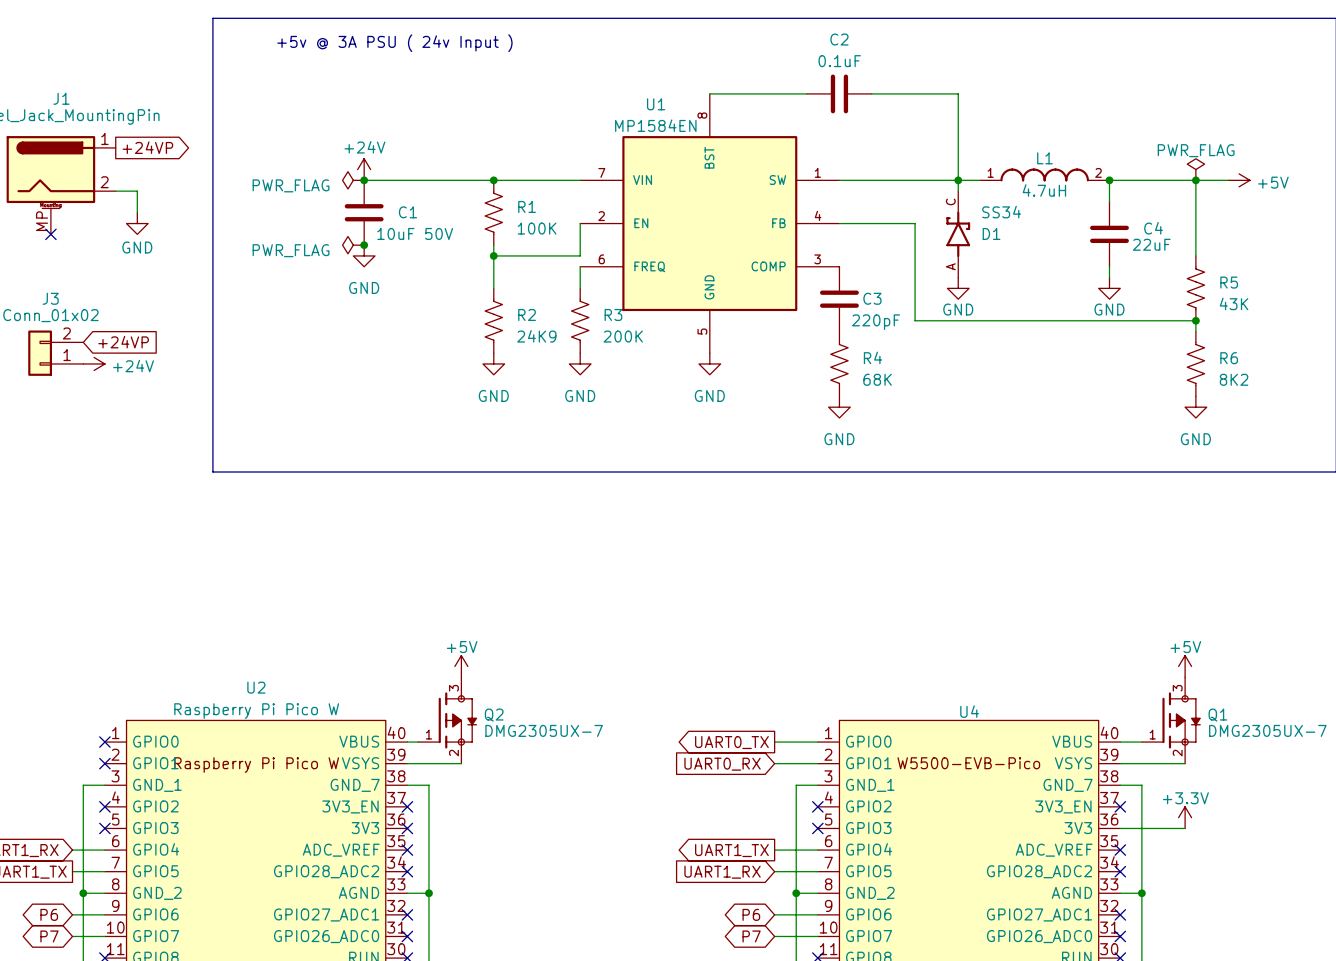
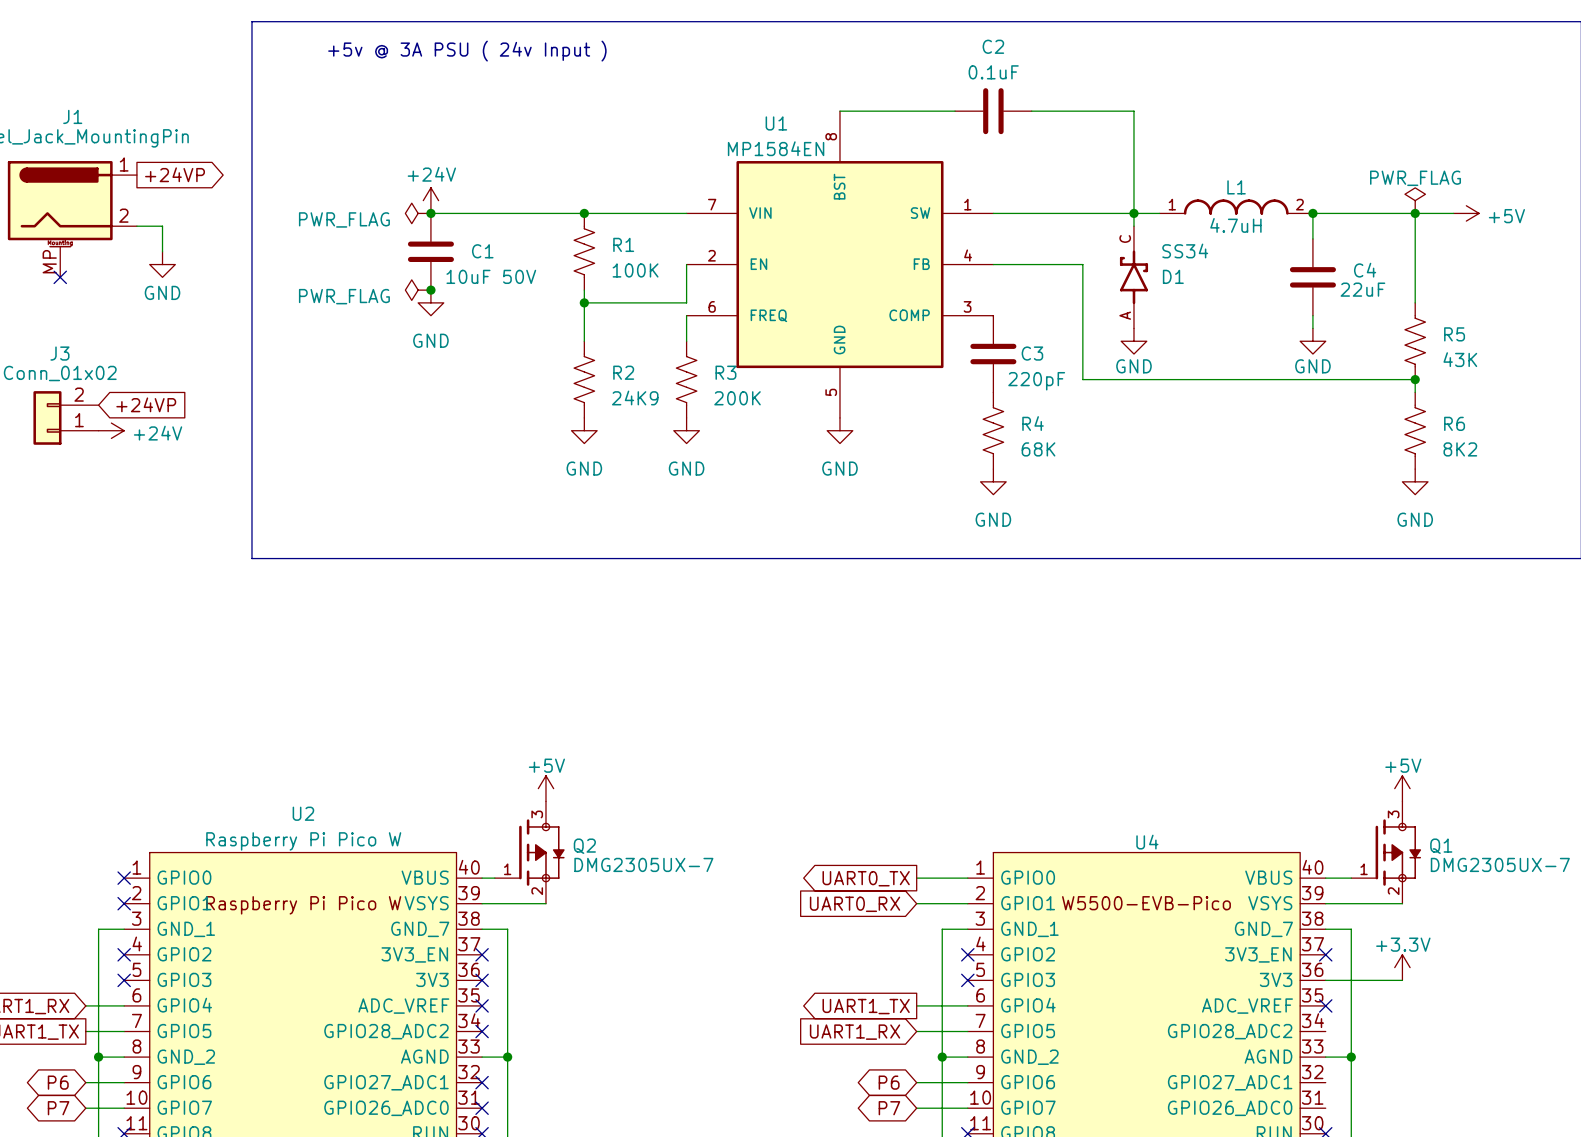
no-connect mark: (1120, 871) -> none
no-connect mark: (1120, 914) -> none
no-connect mark: (1120, 936) -> none

